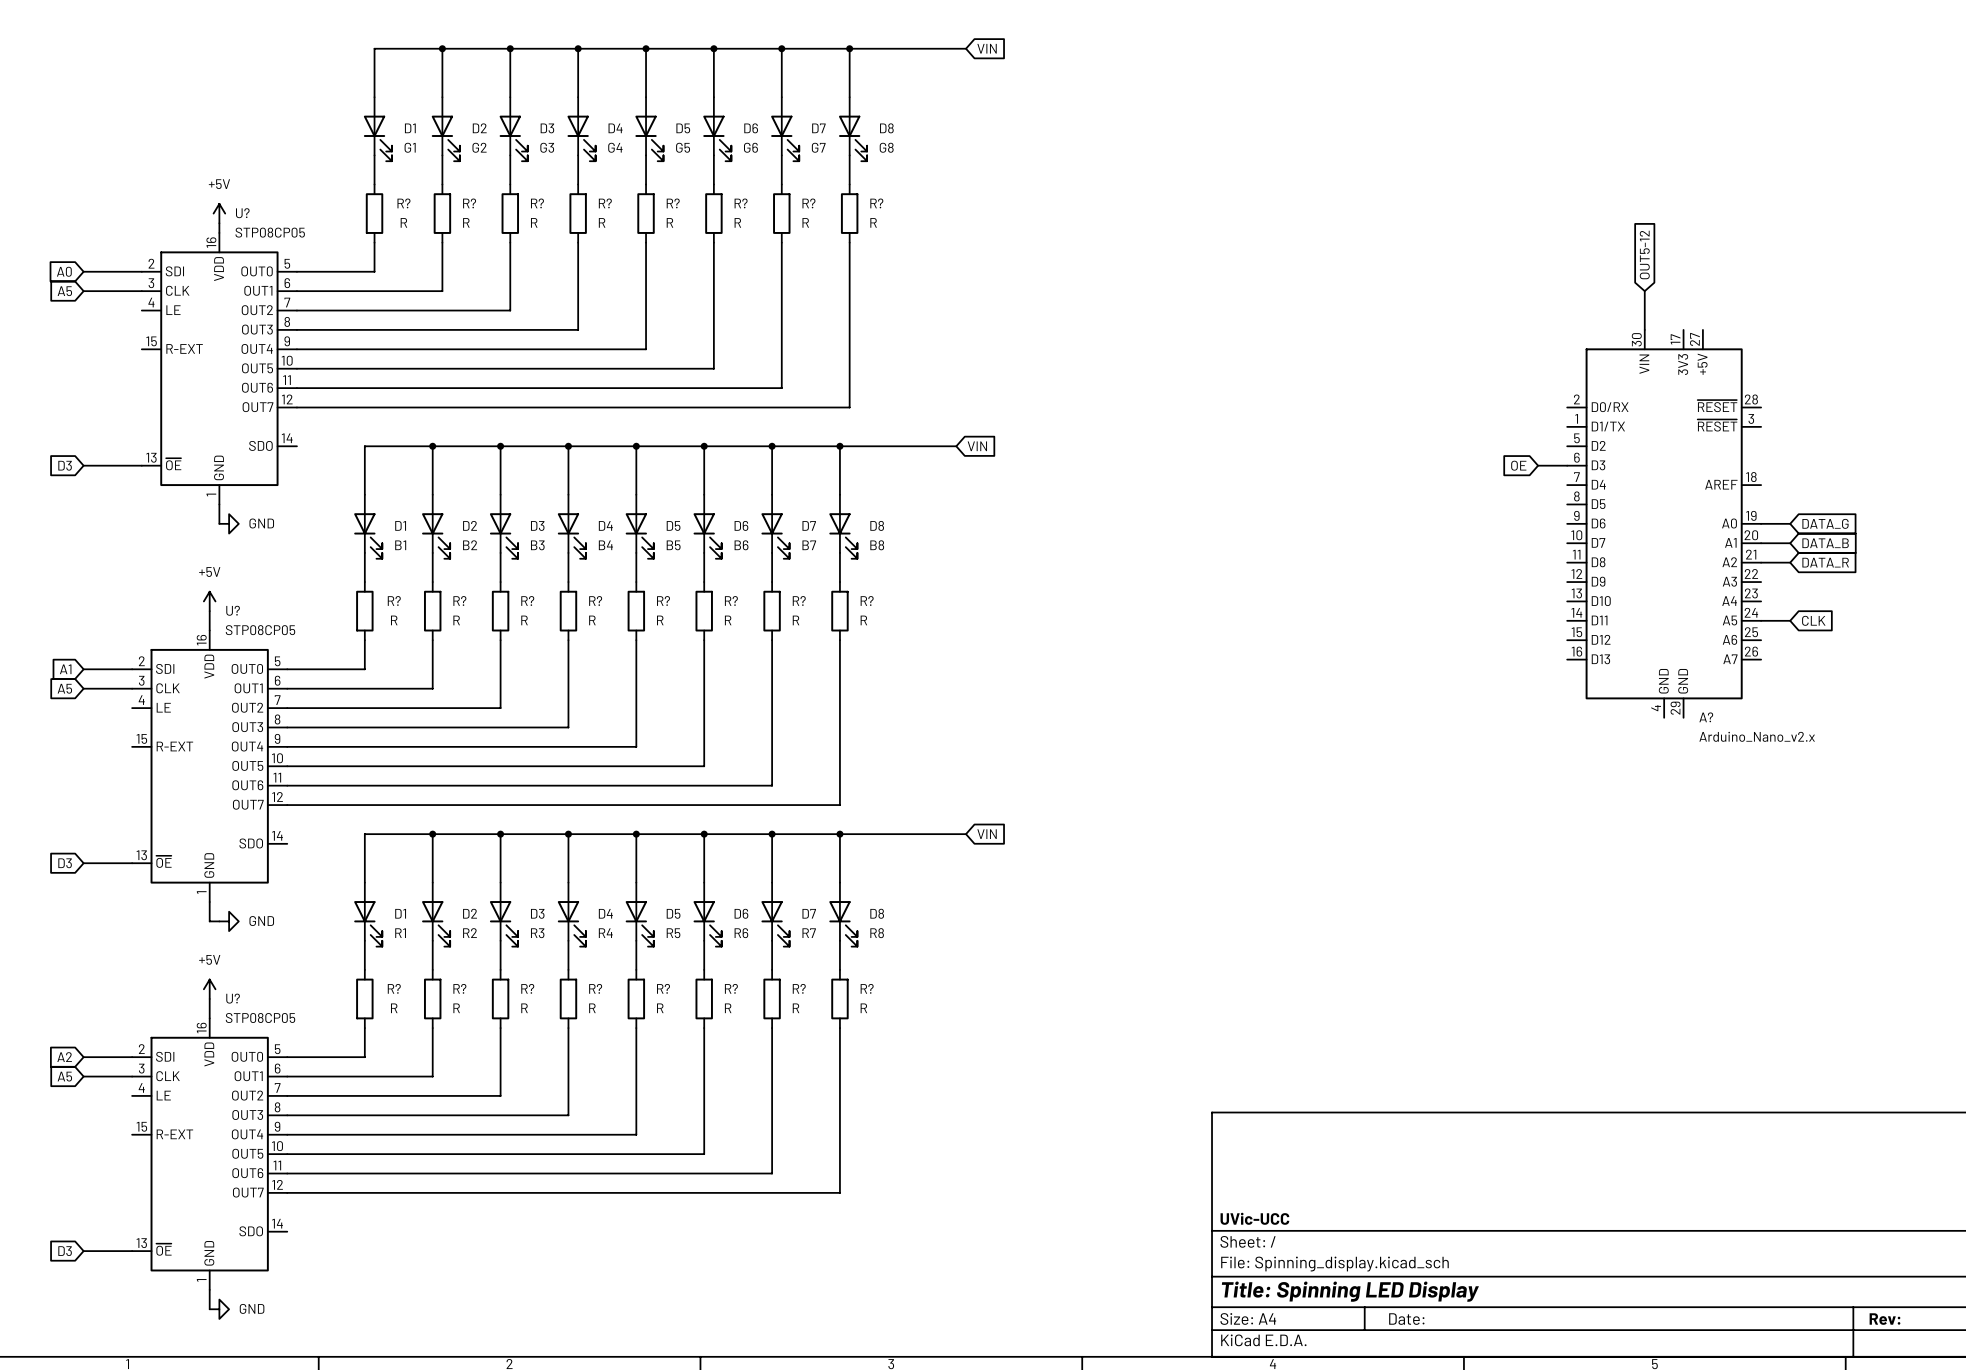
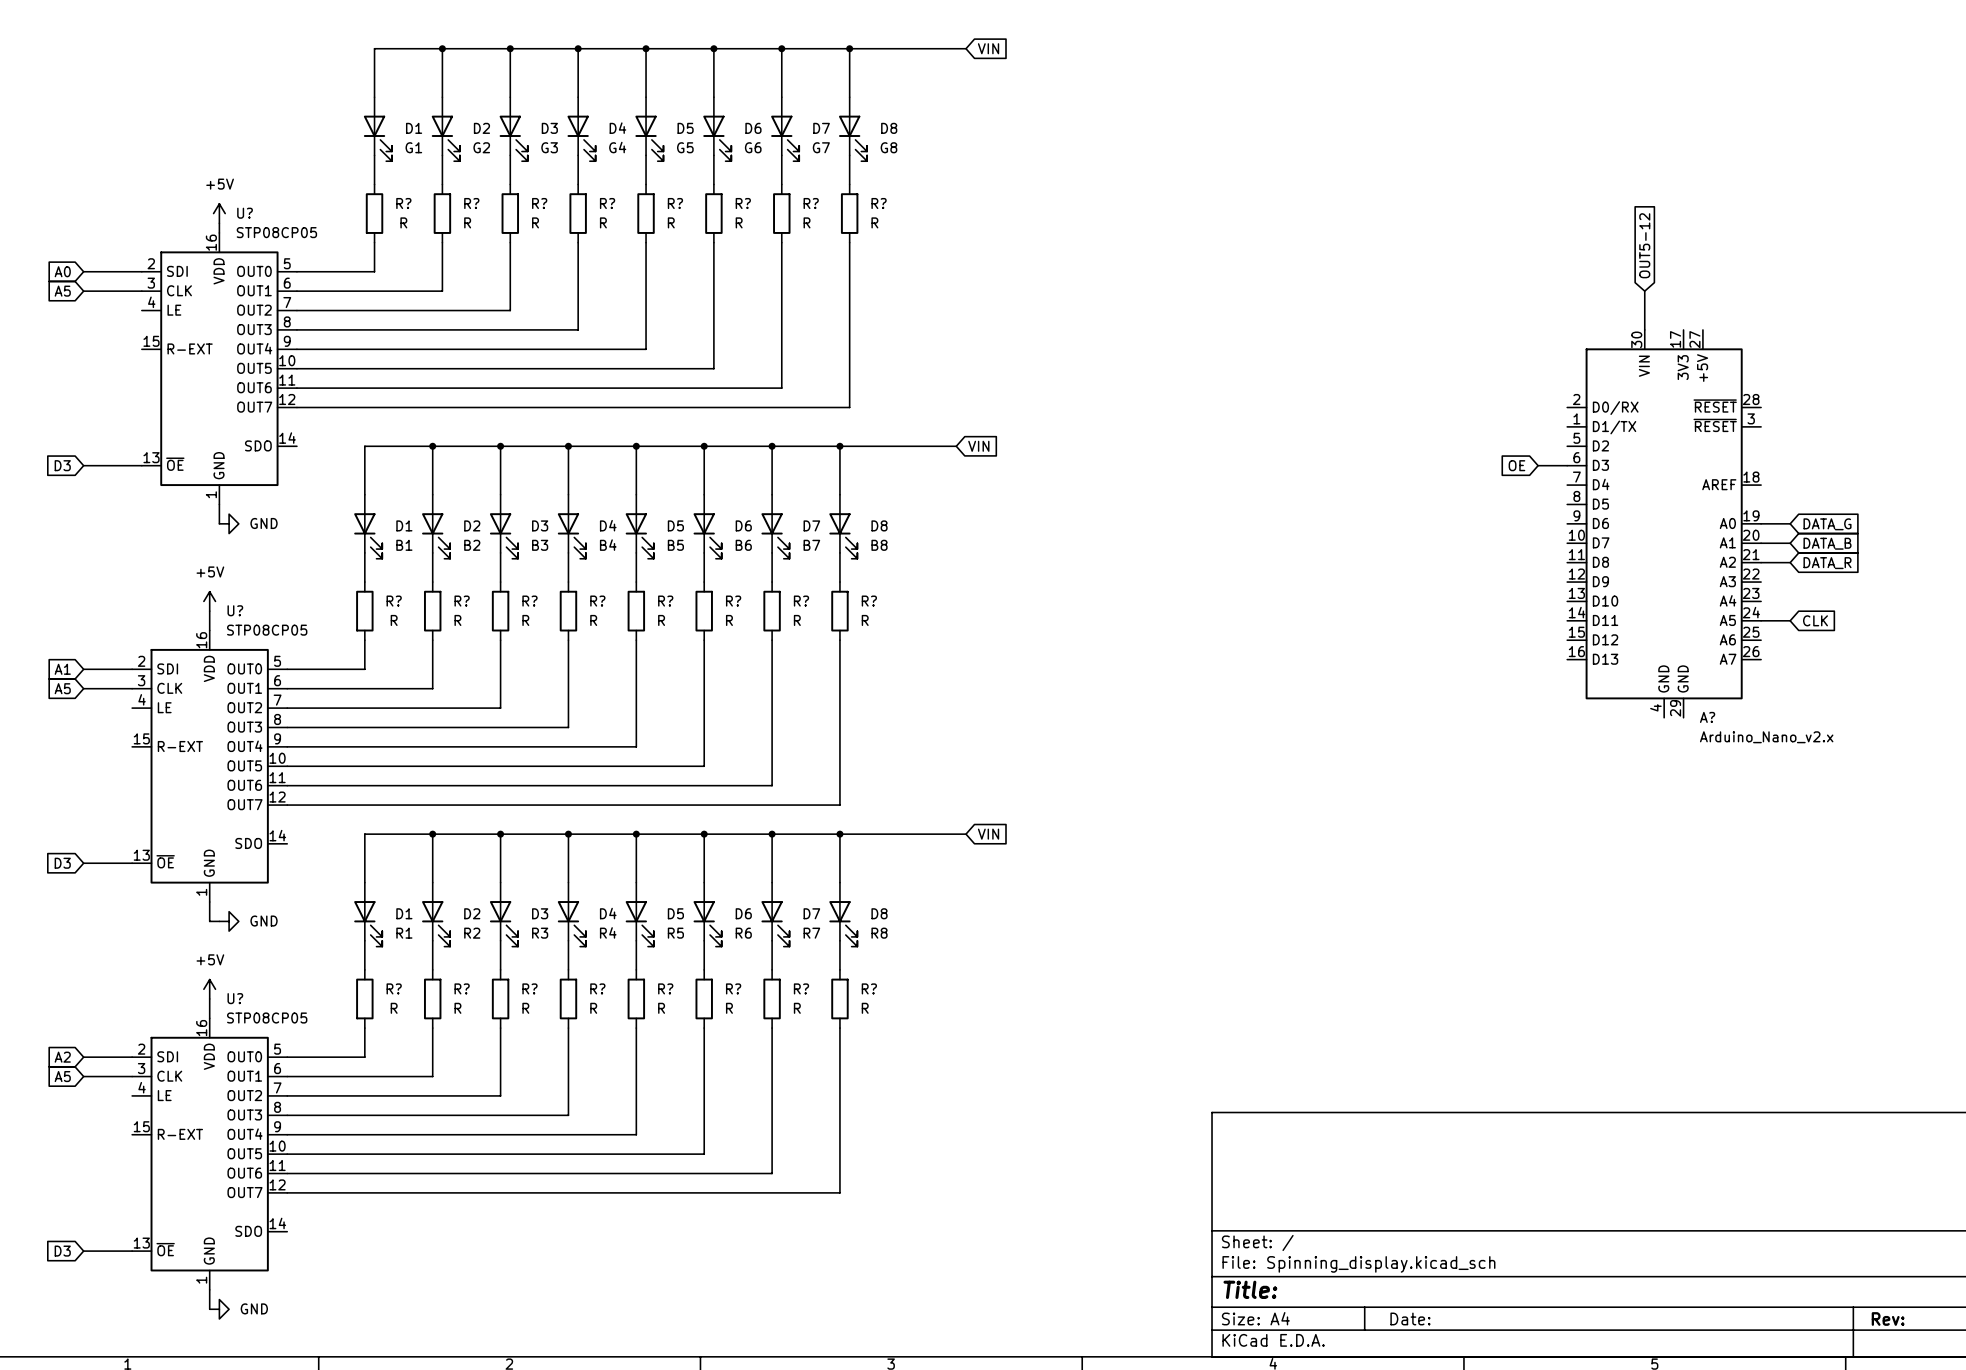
title block: UVic-UCC (1254, 1218) -> none
title block: Title: Spinning LED Display (1350, 1291) -> Title: (1250, 1289)

